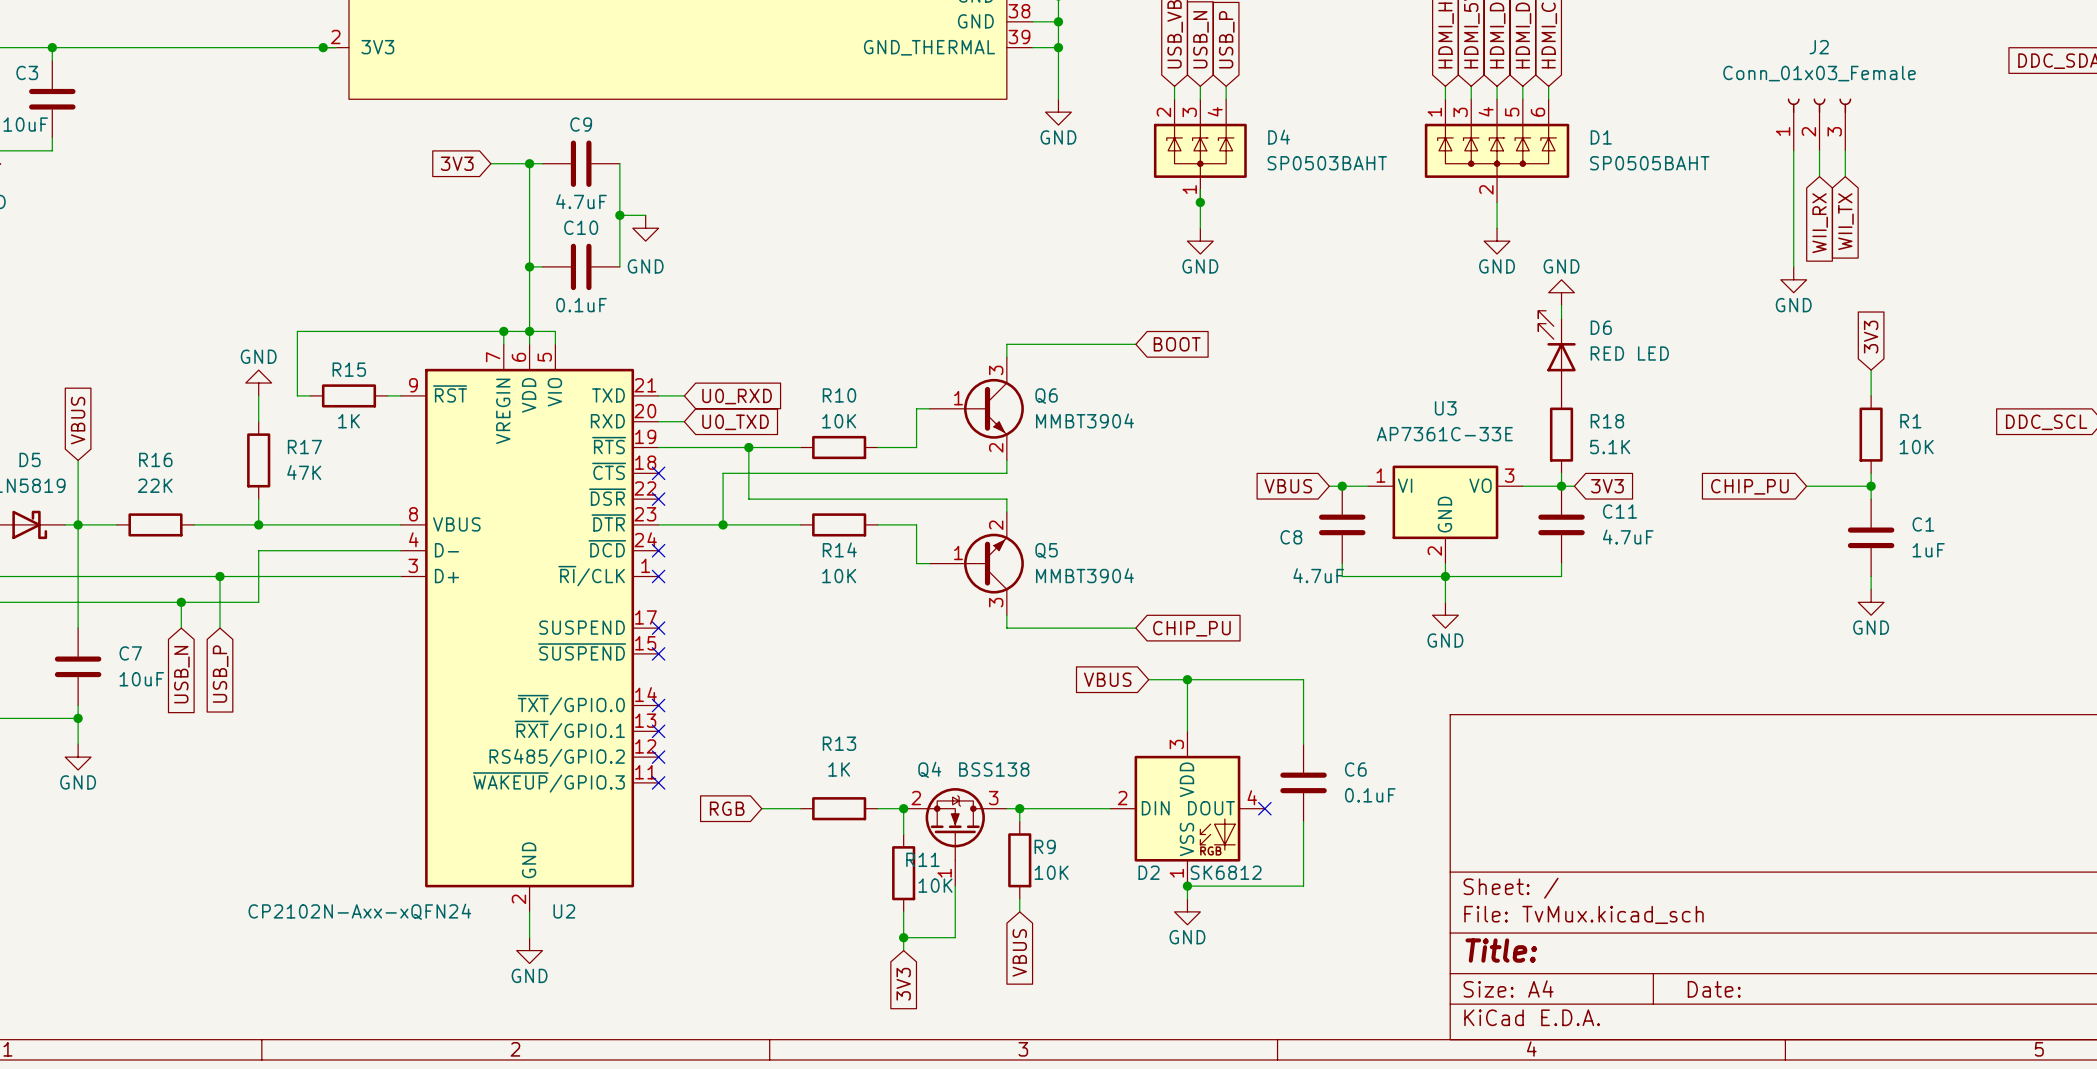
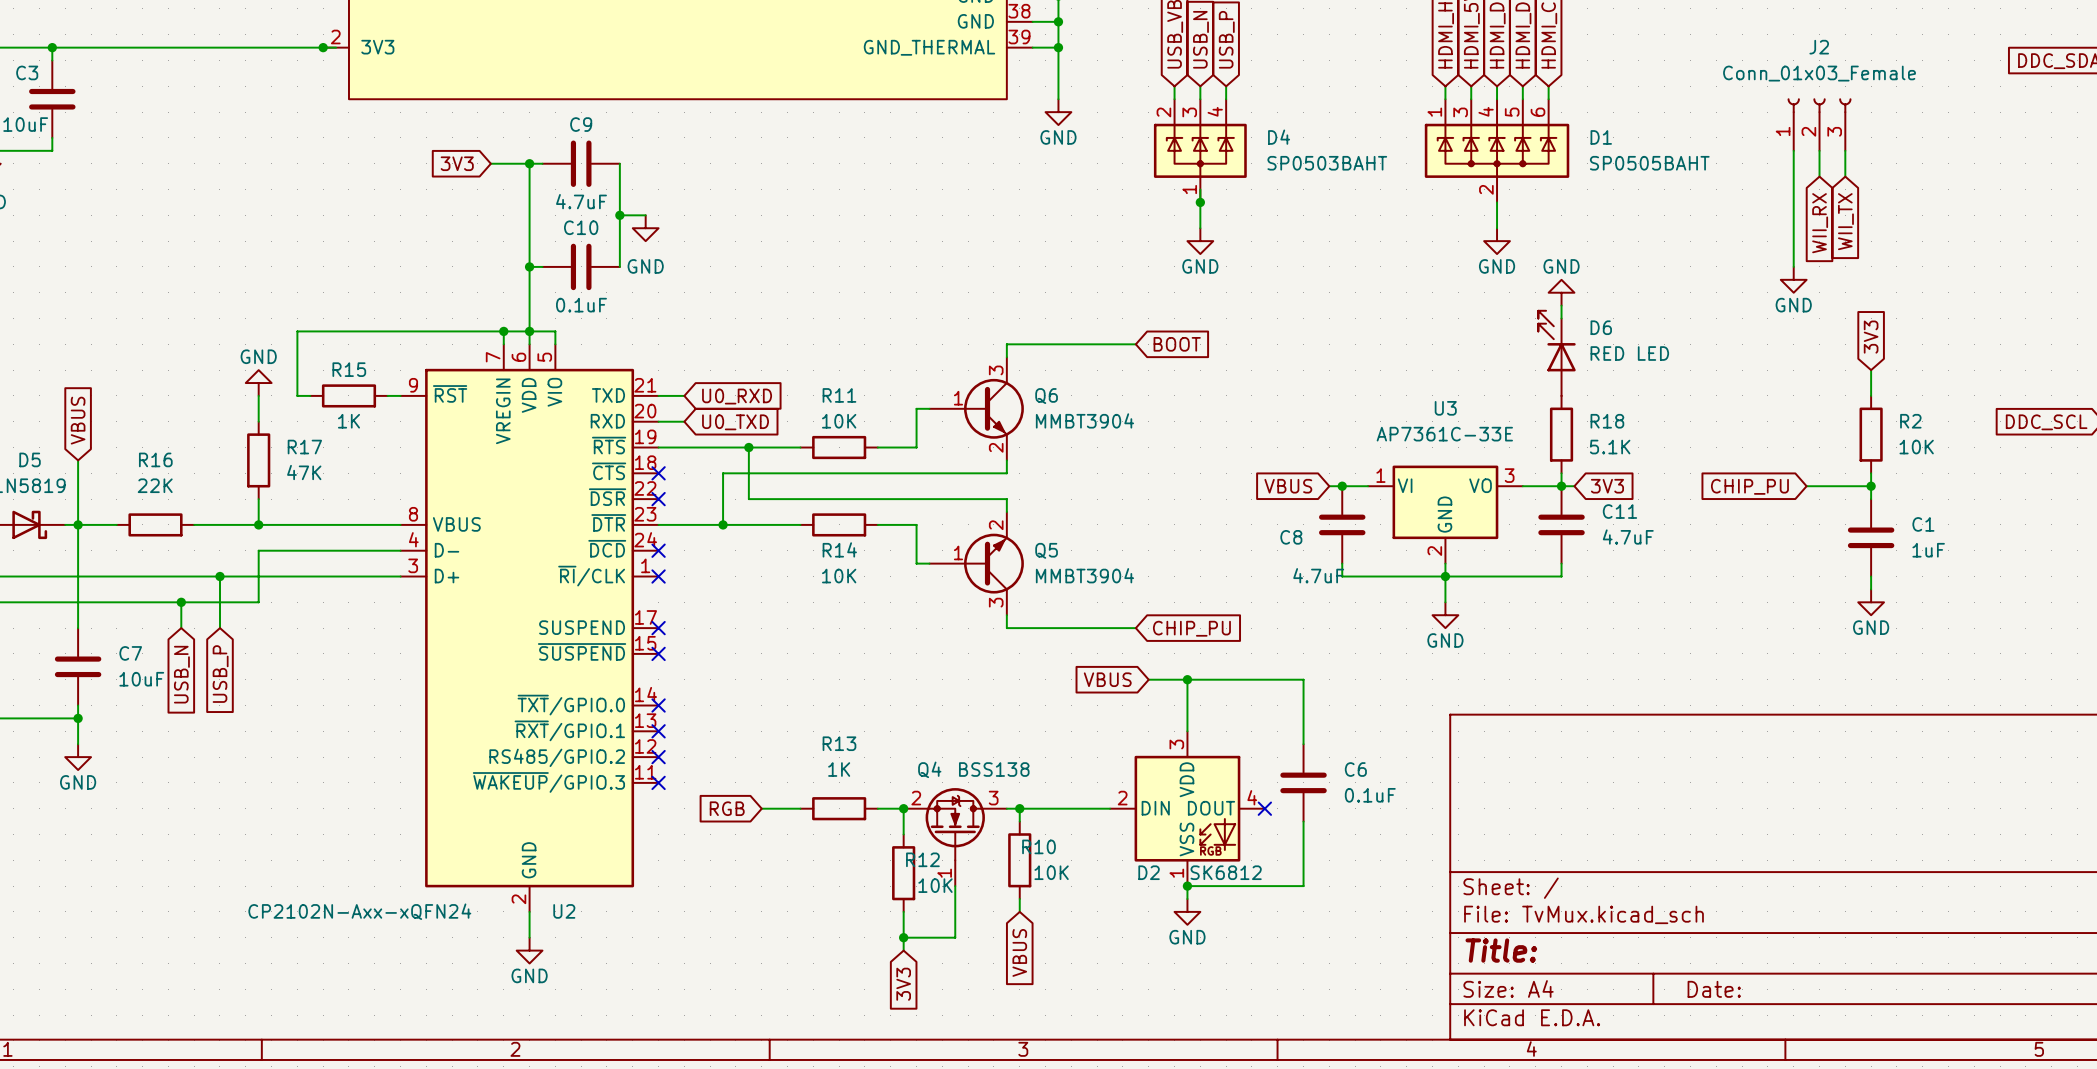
R10 name: R10 (839, 395) -> R11 (839, 395)
R1 name: R1 (1910, 421) -> R2 (1910, 421)
R9 name: R9 (1045, 846) -> R10 (1039, 846)
R11 name: R11 (922, 859) -> R12 (922, 859)

